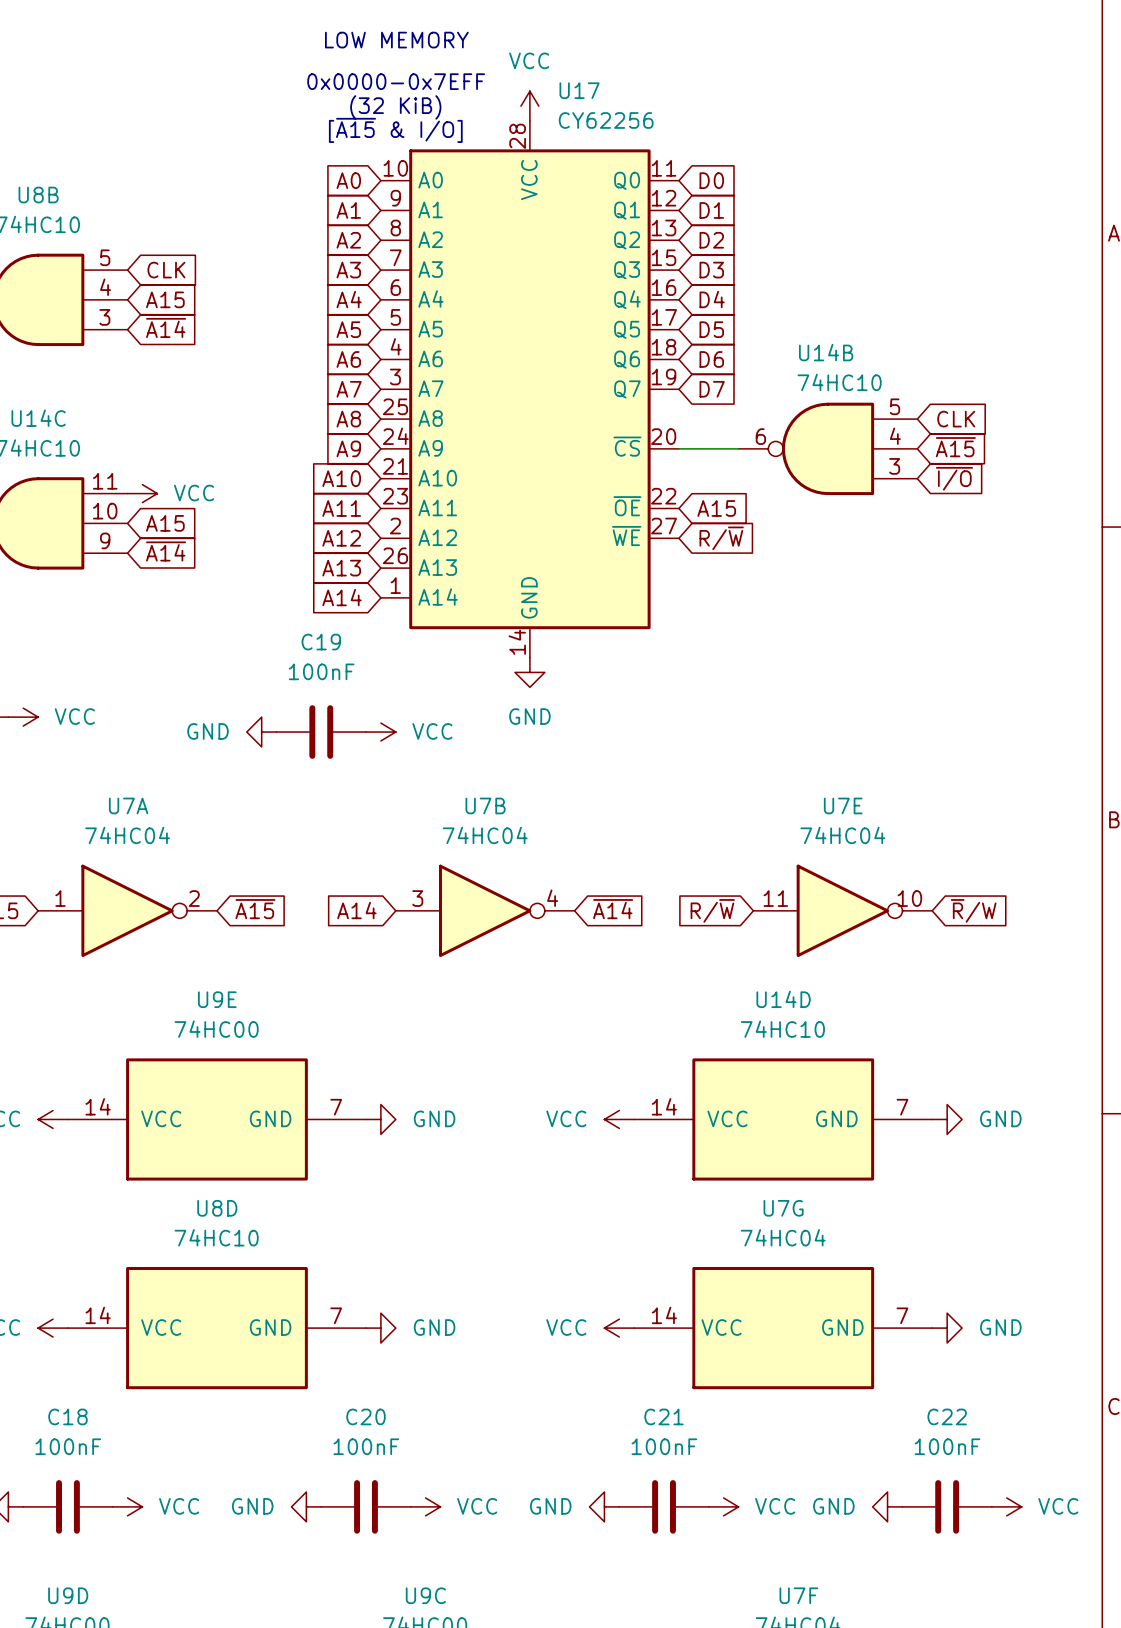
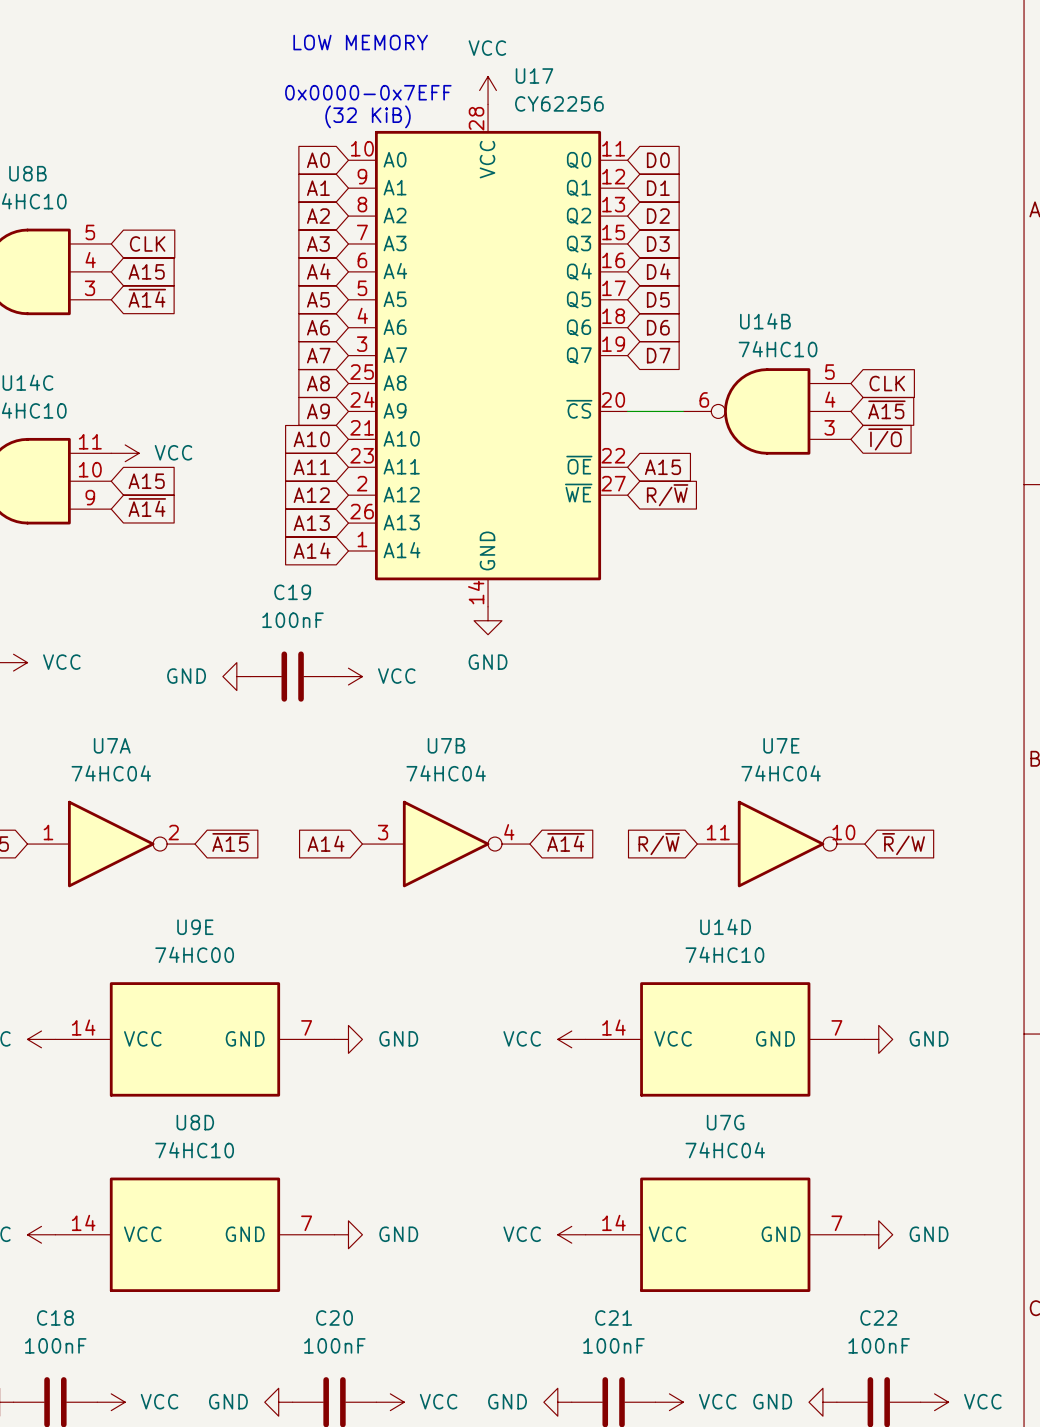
text position: LOW MEMORY (396, 40) -> LOW MEMORY (360, 42)
text position: 0x0000-0x7EFF (396, 81) -> 0x0000-0x7EFF (368, 92)
text position: (32 KiB) (395, 107) -> (32 KiB) (368, 116)
text: [~{A15} & I/O] (395, 130) -> none

